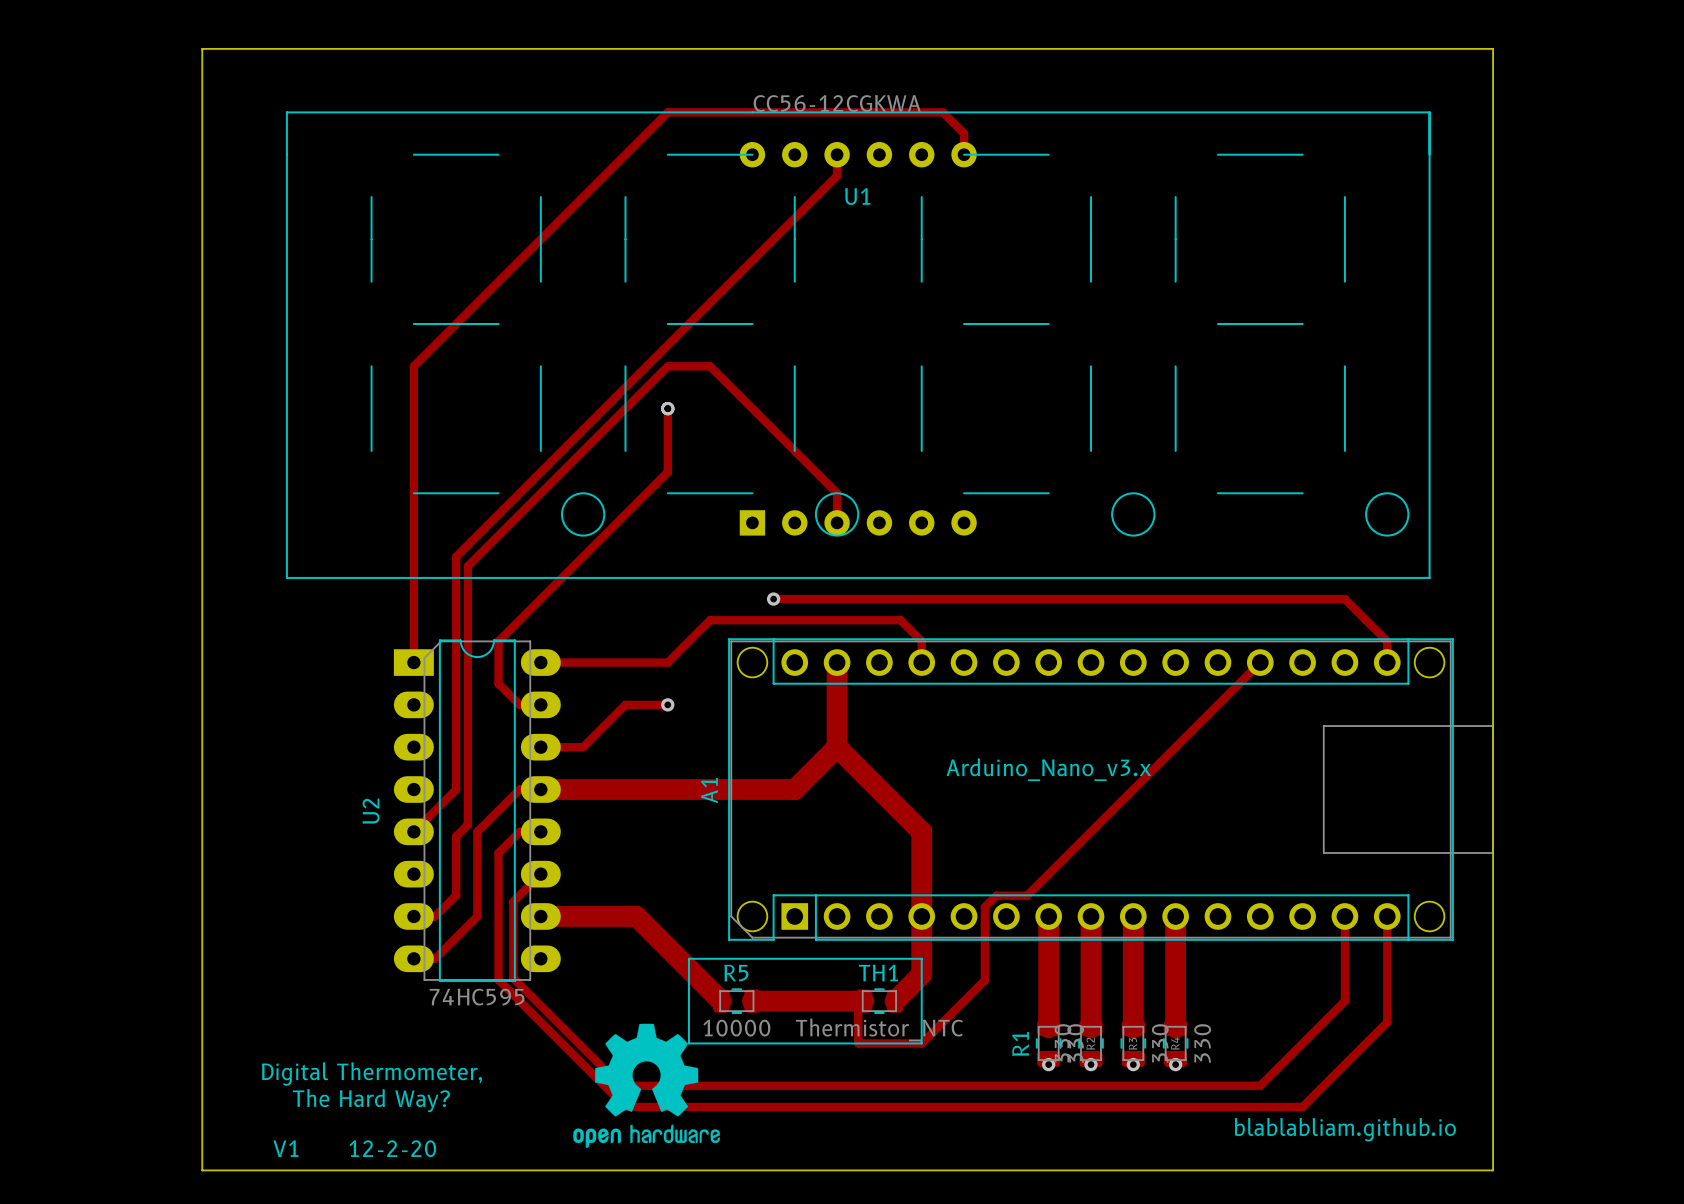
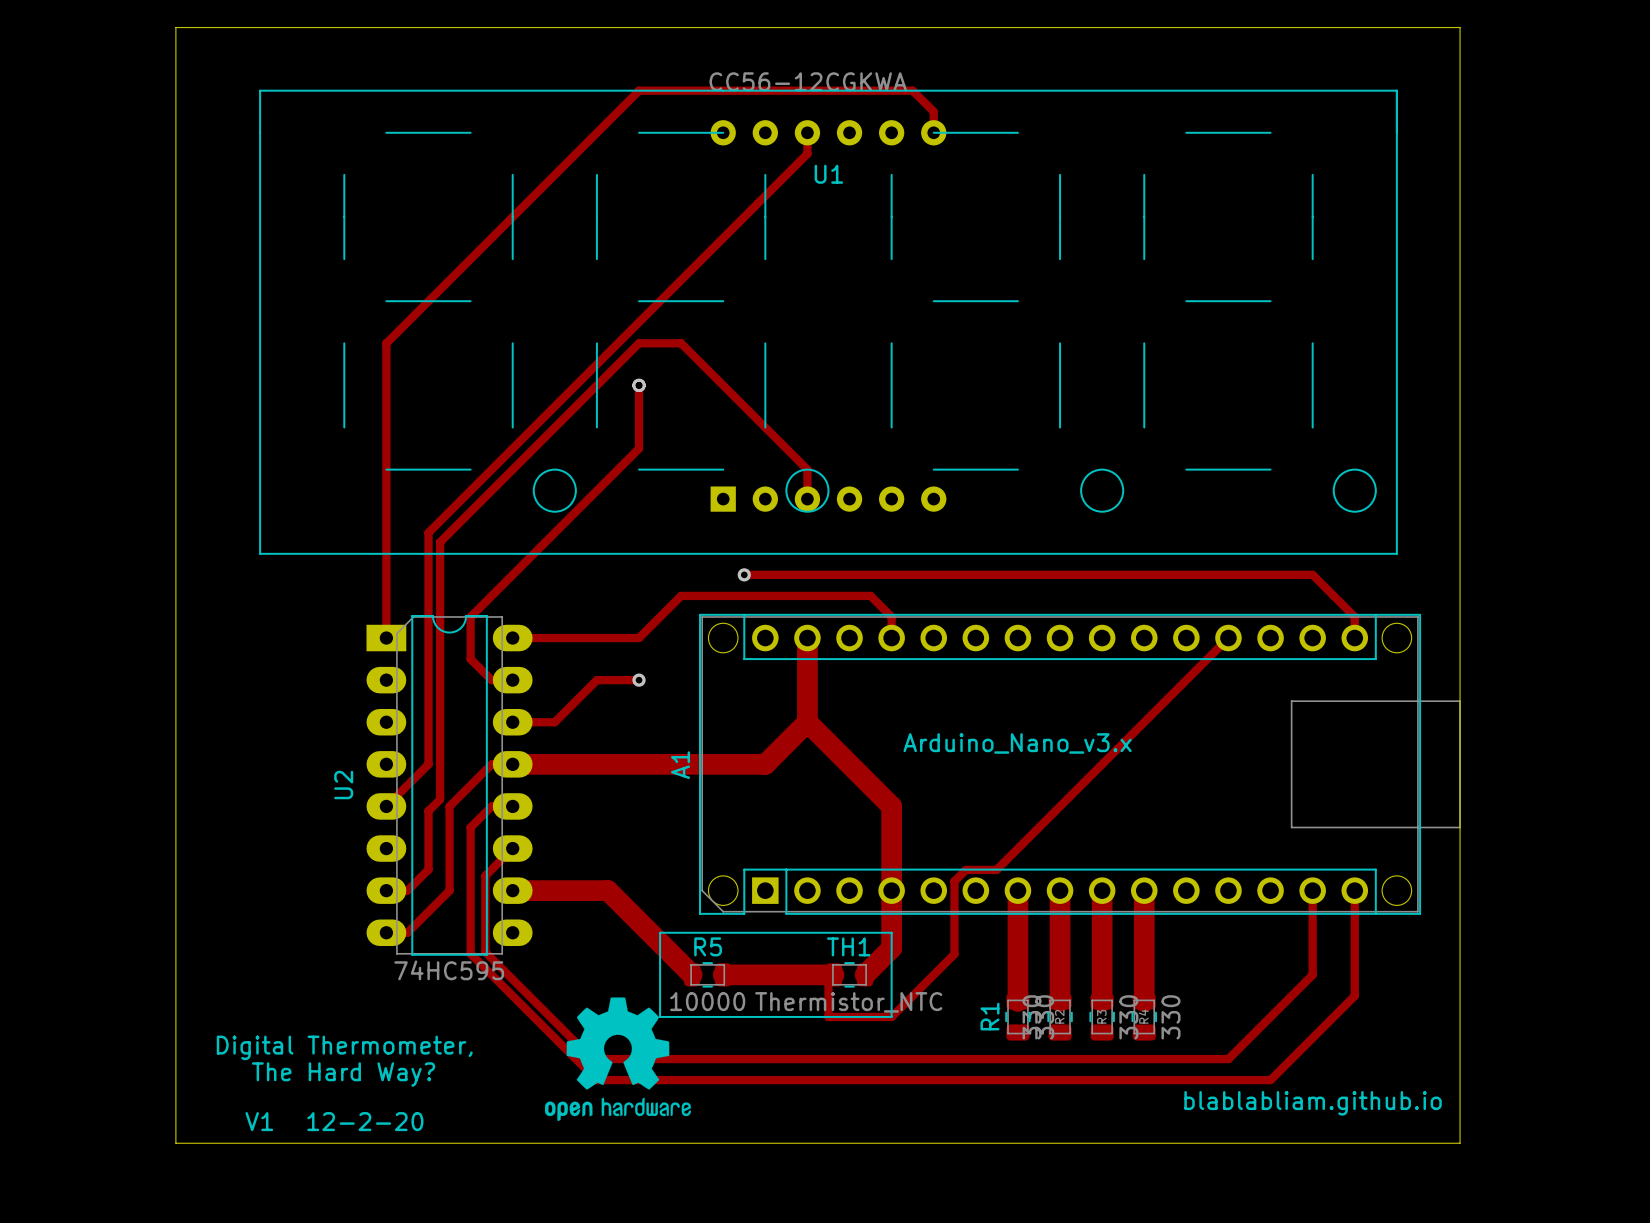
via: (1048, 1064) -> none
via: (1091, 1064) -> none
via: (1133, 1064) -> none
via: (1175, 1064) -> none

